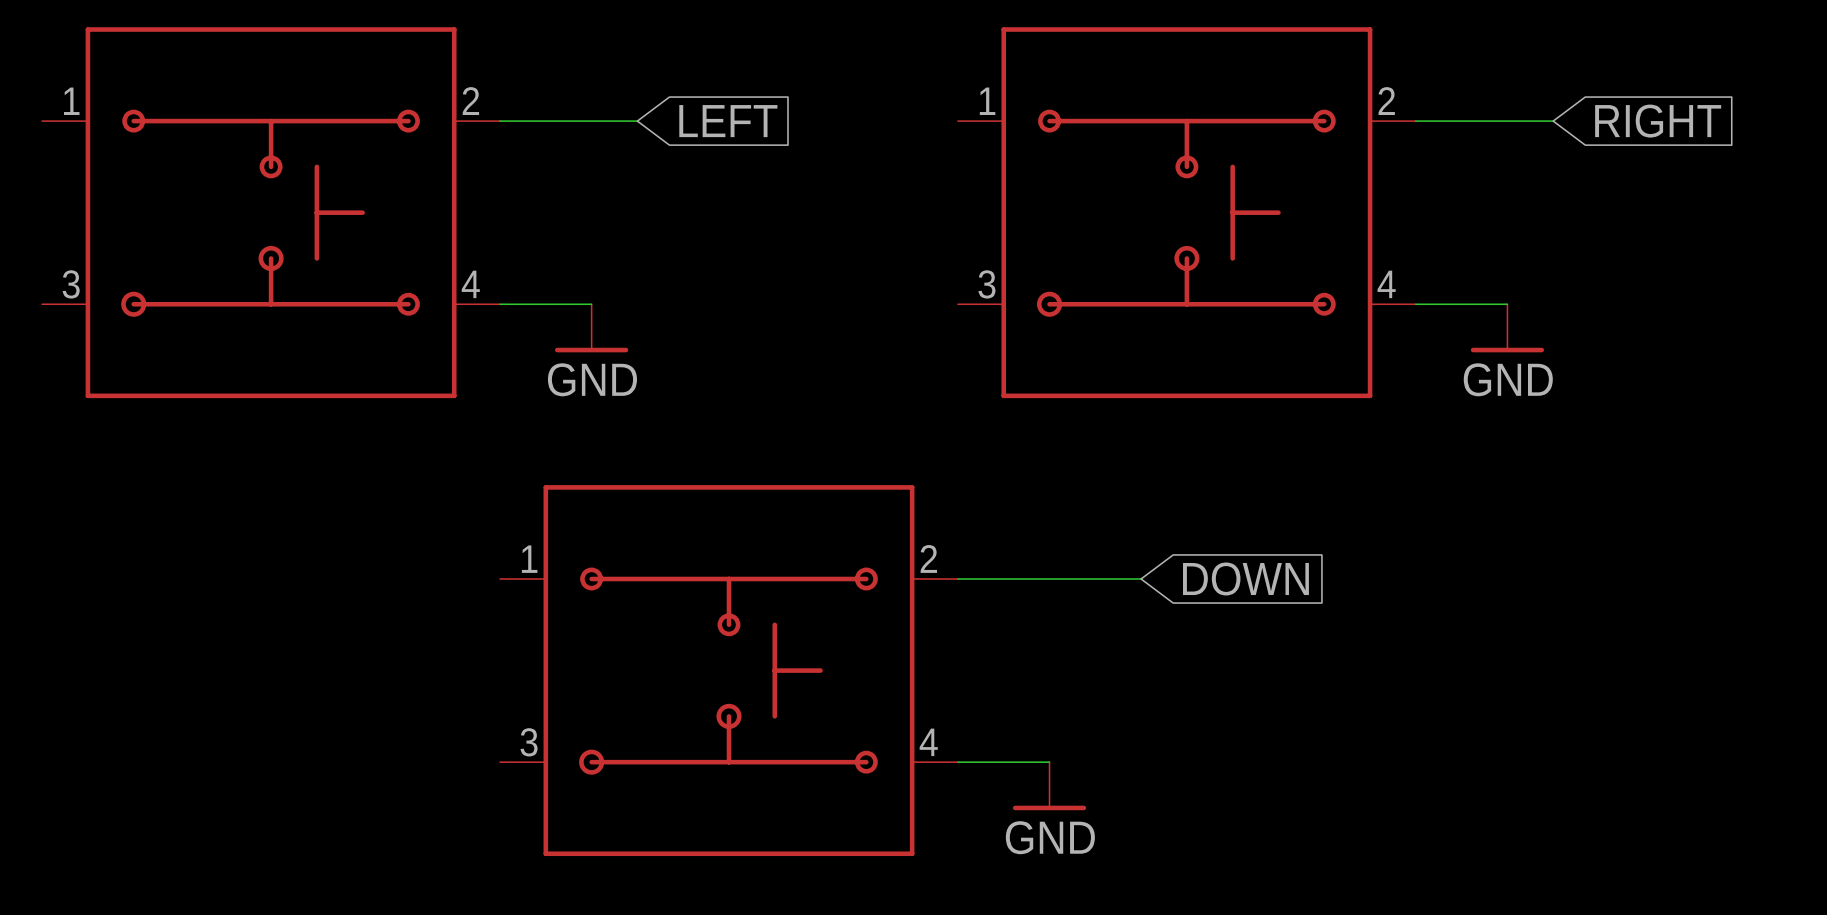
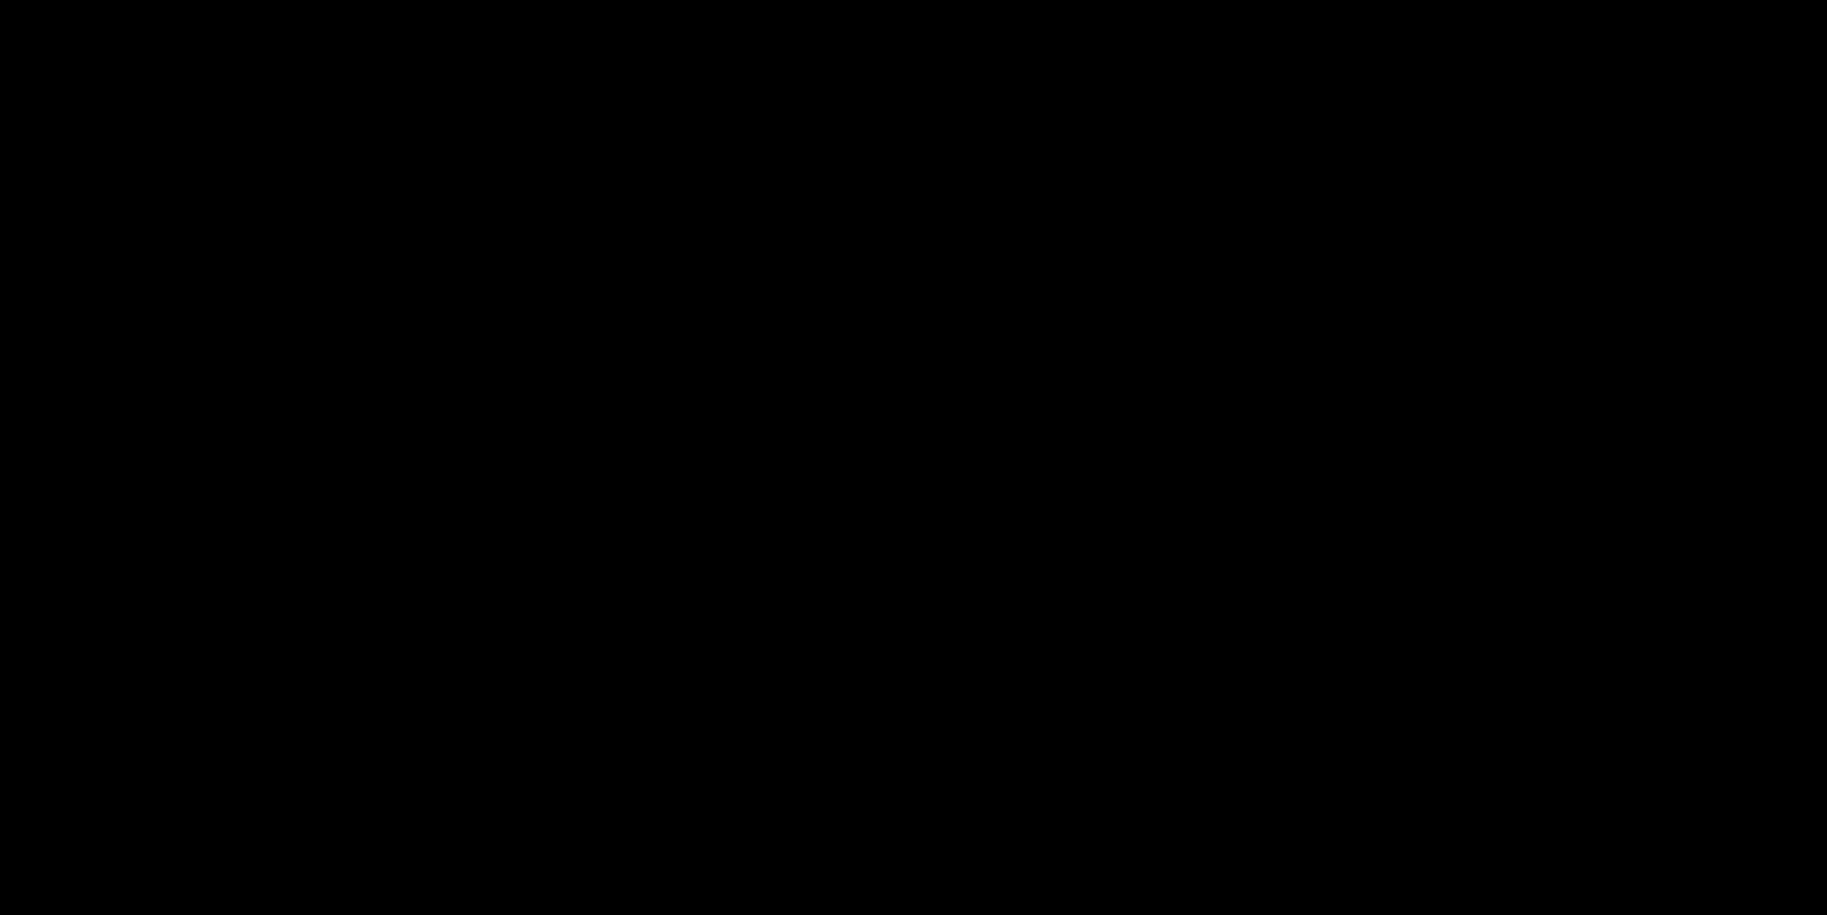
wire: (500, 121) (637, 121) -> none
global label: LEFT (728, 121) -> none
wire: (1415, 121) (1553, 121) -> none
global label: RIGHT (1658, 121) -> none
part: (271, 212) -> none
part: (1186, 212) -> none
wire: (500, 304) (591, 304) -> none
wire: (1415, 304) (1507, 304) -> none
power symbol: GND (591, 328) -> none
power symbol: GND (1507, 328) -> none
global label: DOWN (1245, 578) -> none
wire: (957, 579) (1141, 579) -> none
part: (728, 670) -> none
wire: (957, 762) (1049, 762) -> none
power symbol: GND (1049, 786) -> none

